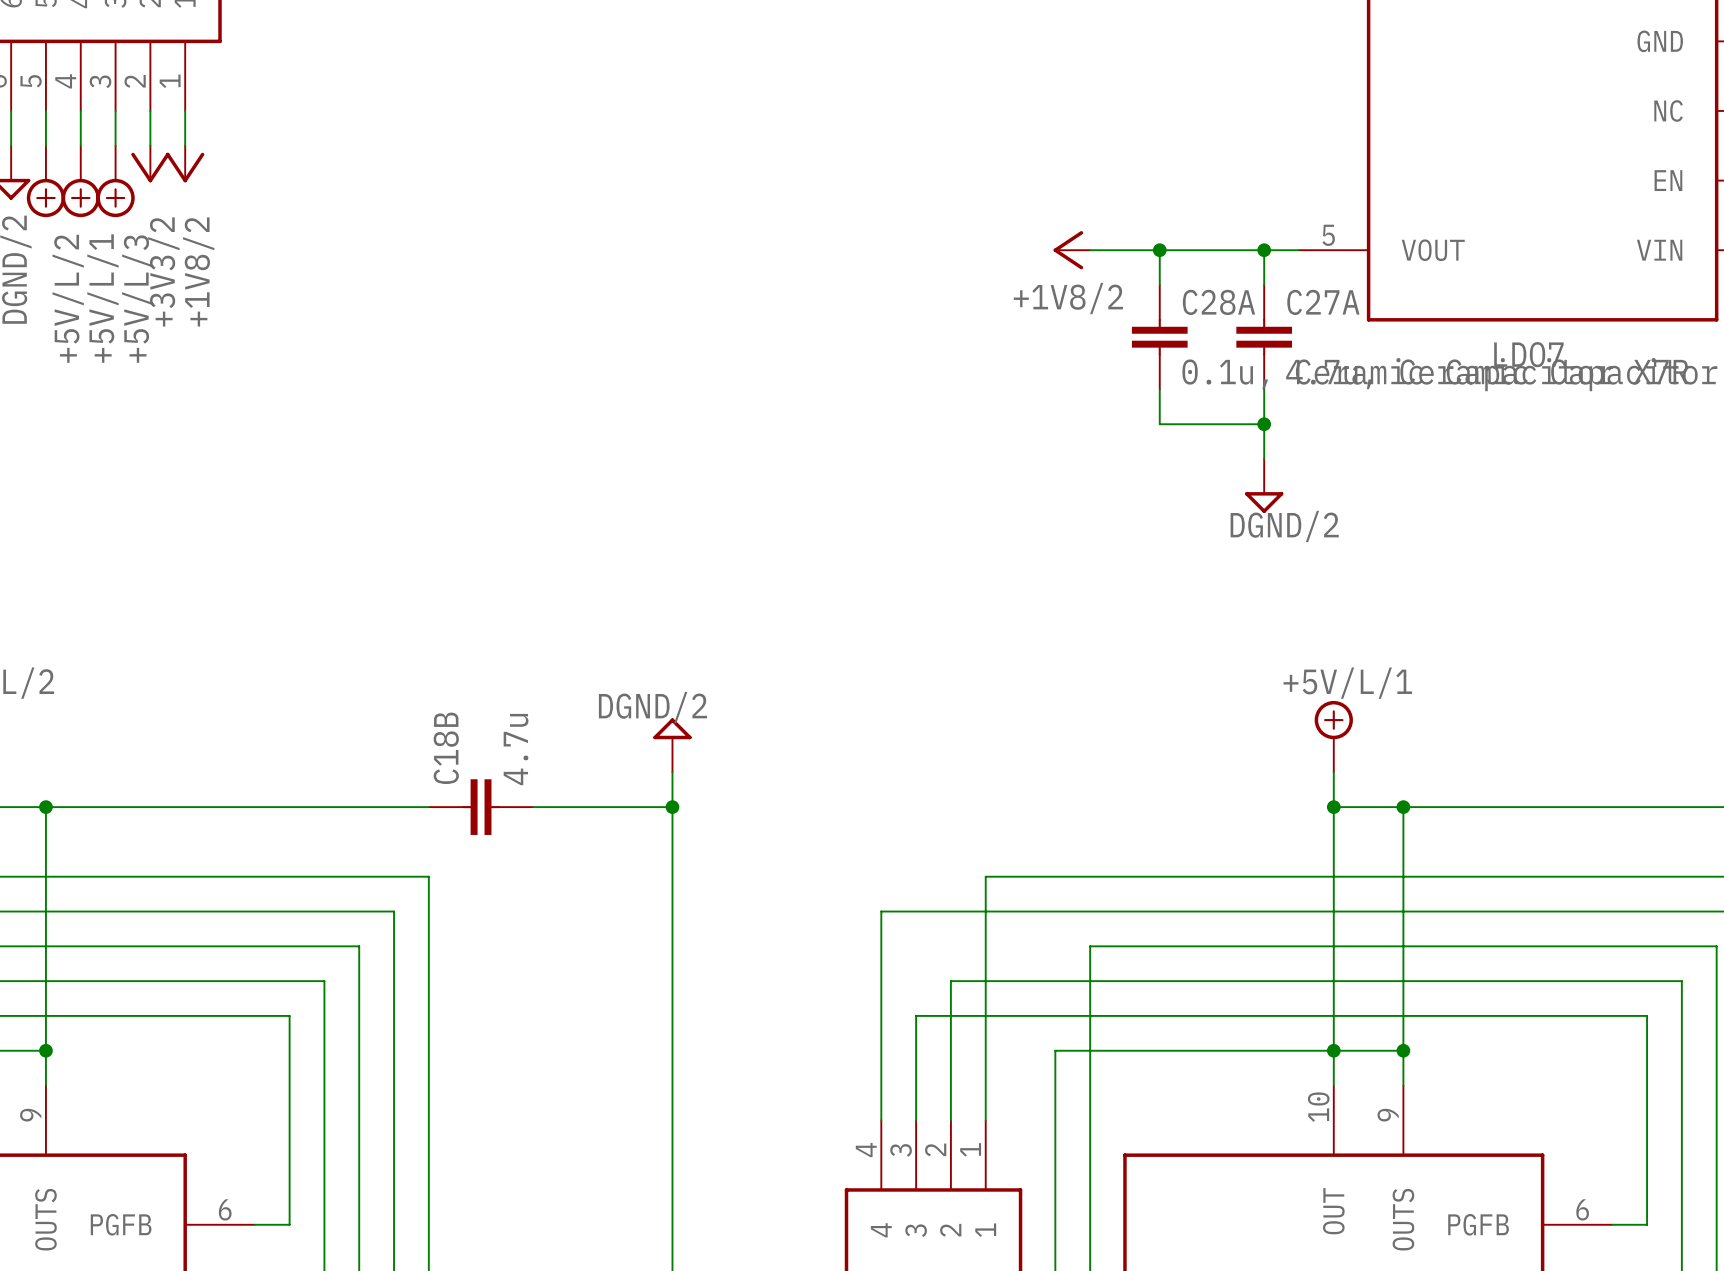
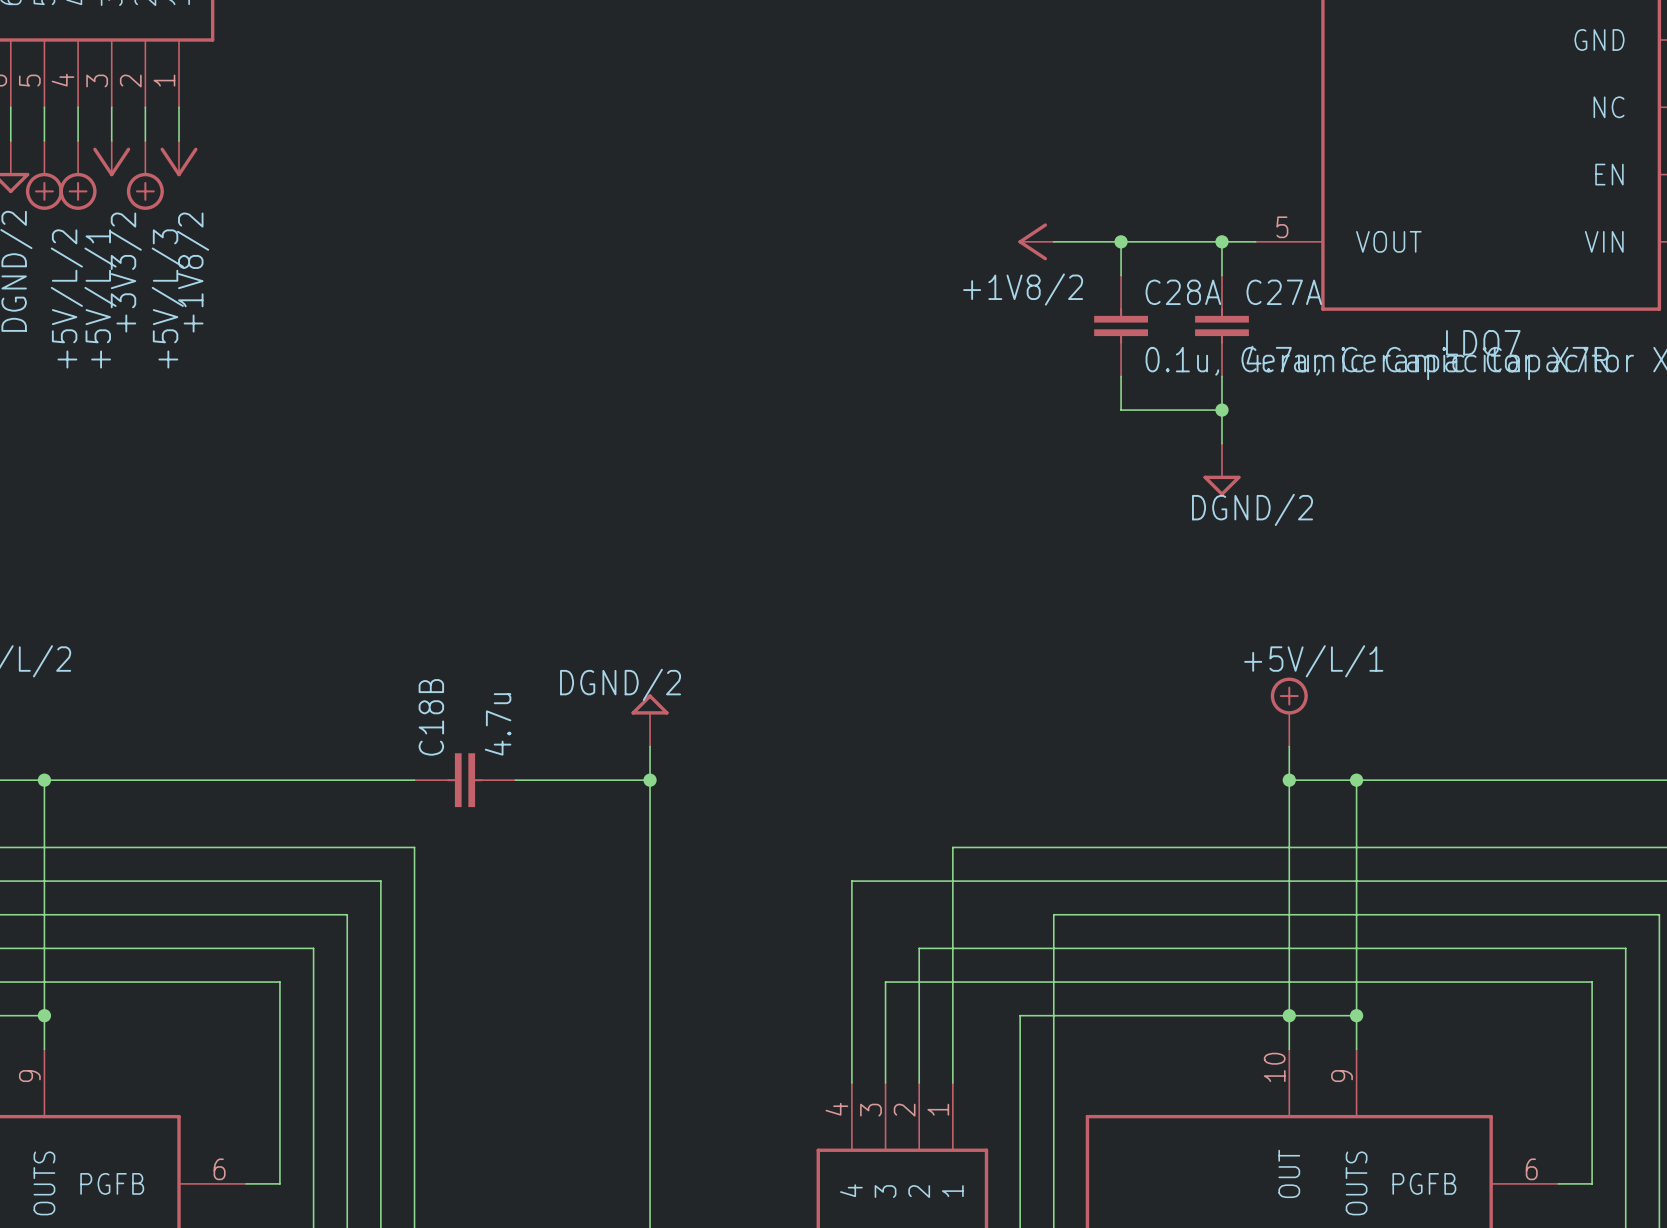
power symbol position: +3V3/2 (150, 164) -> +3V3/2 (111, 158)
power symbol position: +5V/L/3 (115, 181) -> +5V/L/3 (145, 175)

